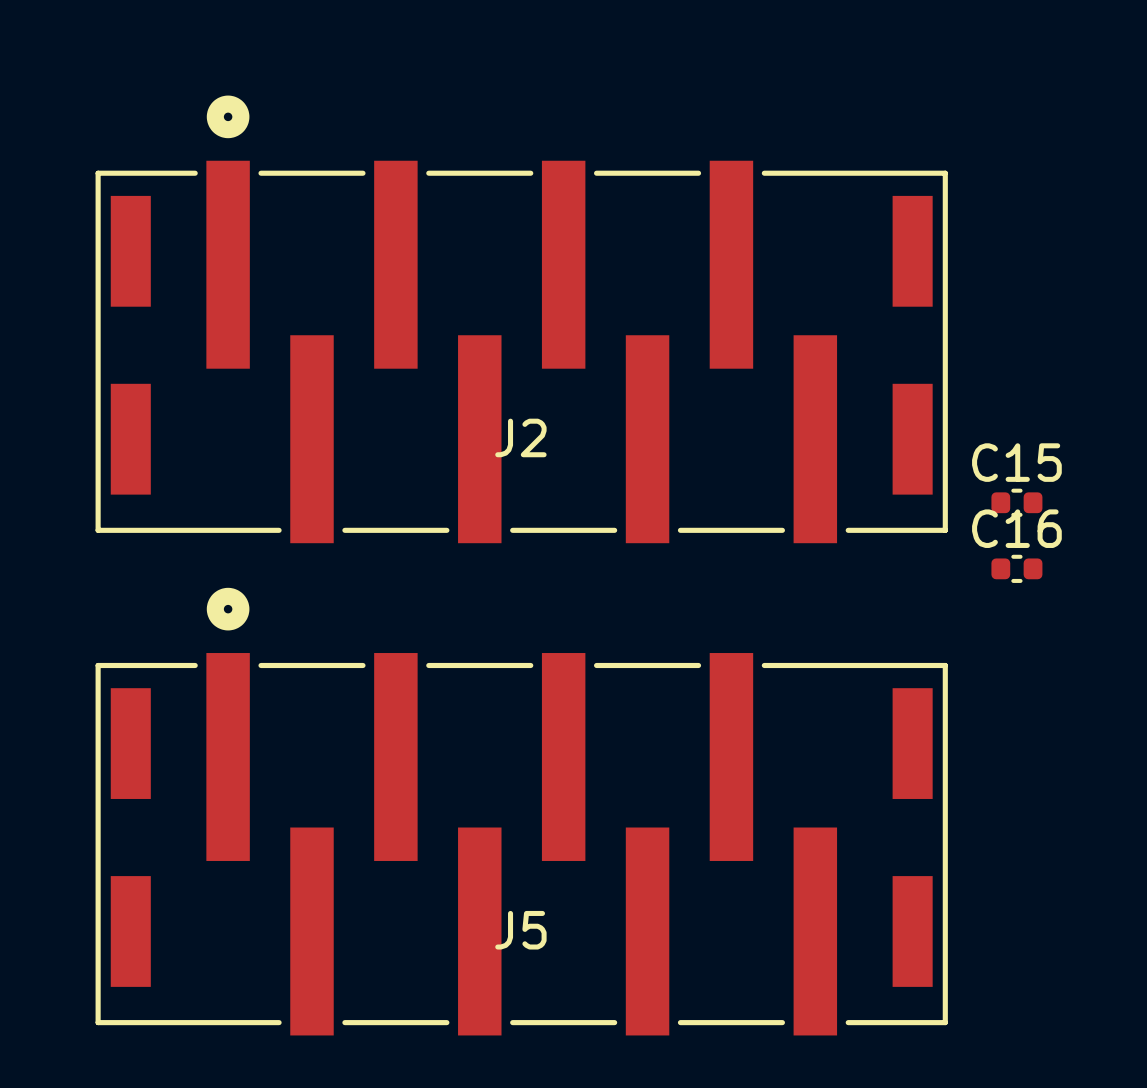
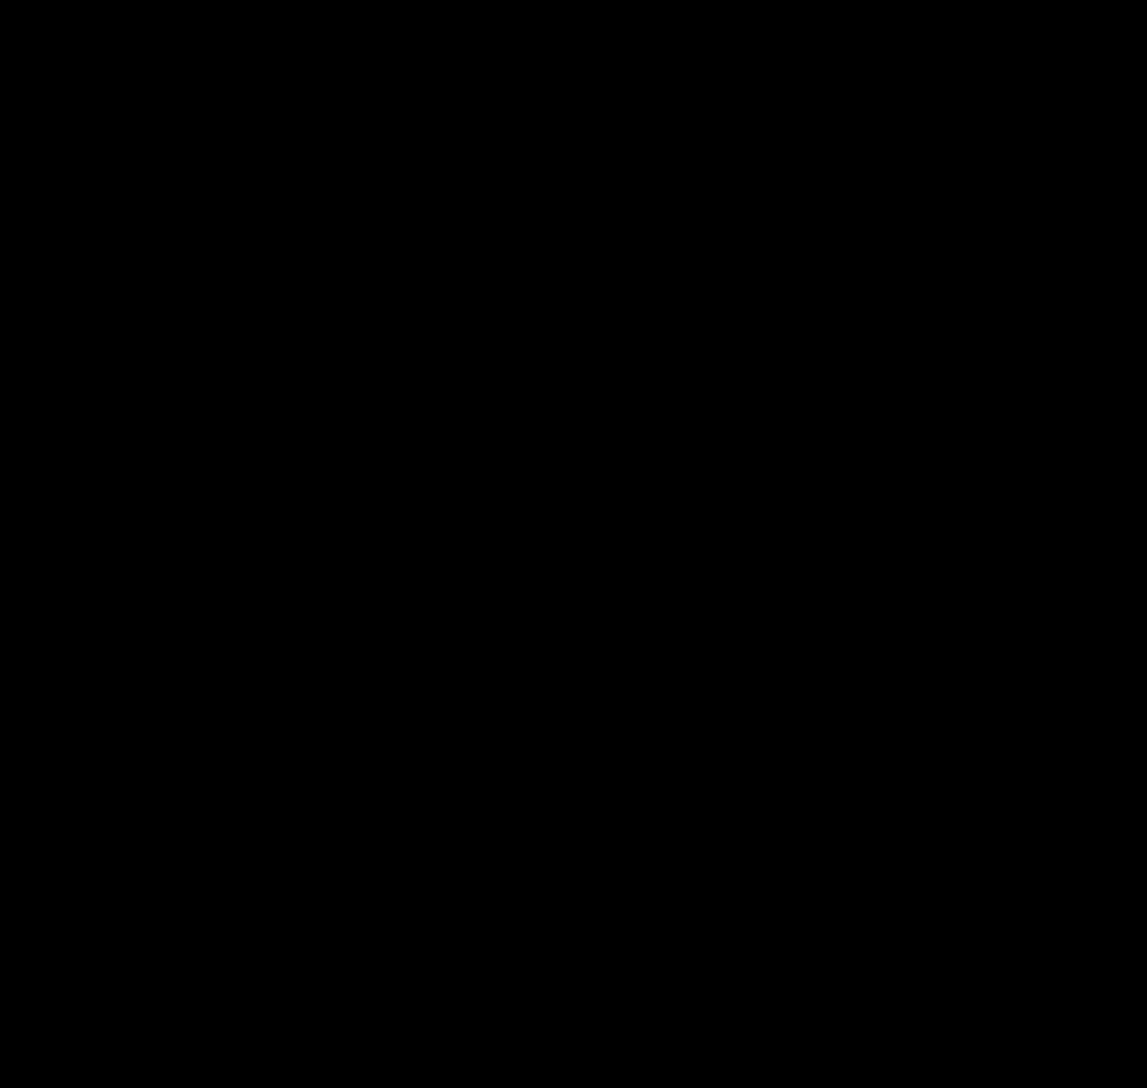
J2: (521, 319) -> none
C15: (1016, 502) -> none
C16: (1016, 568) -> none
J5: (521, 811) -> none

